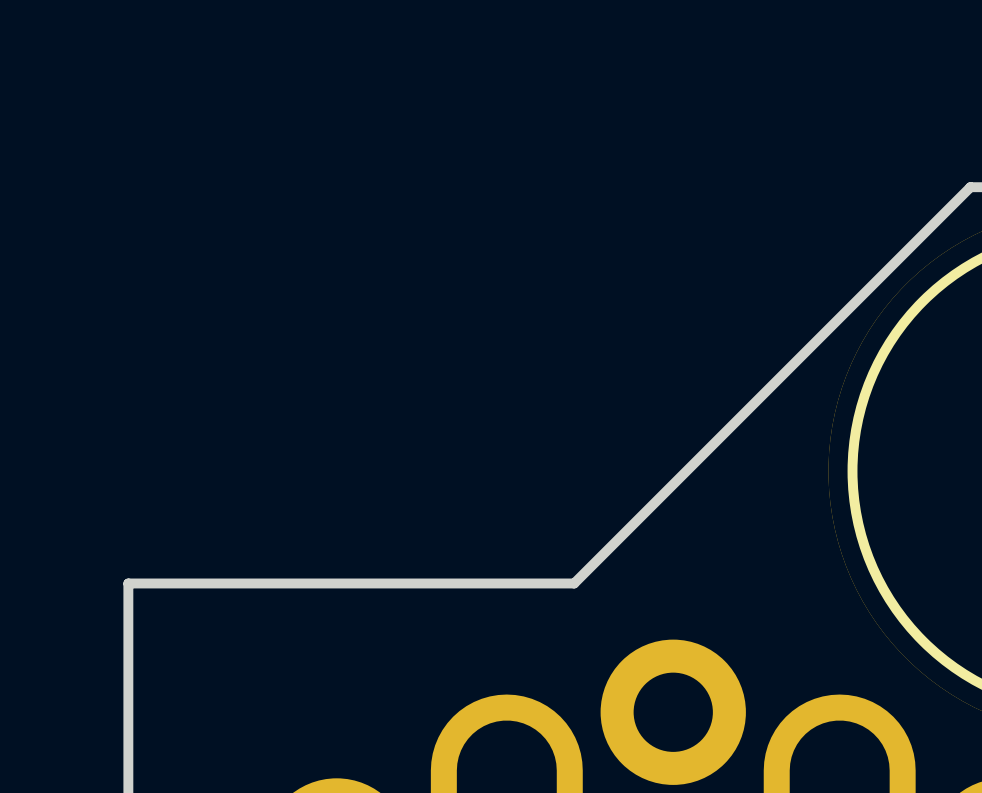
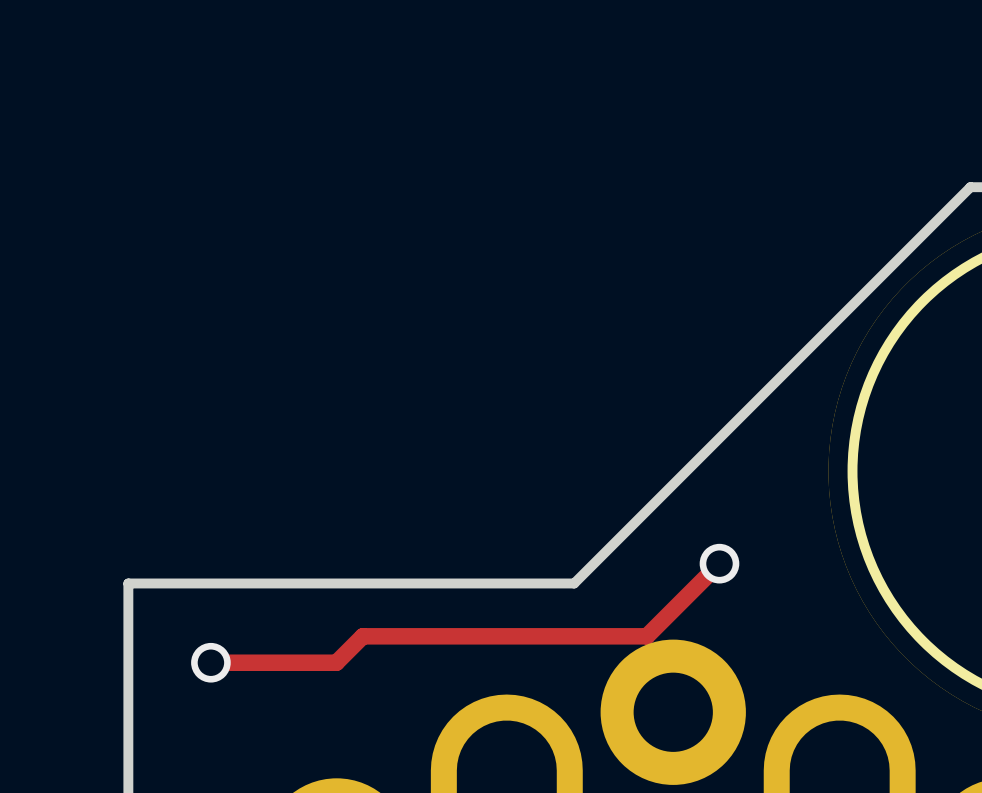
track: none -> (719, 563) (646, 636) (362, 636) (336, 662) (210, 662)
via: none -> (719, 563)
via: none -> (210, 662)

